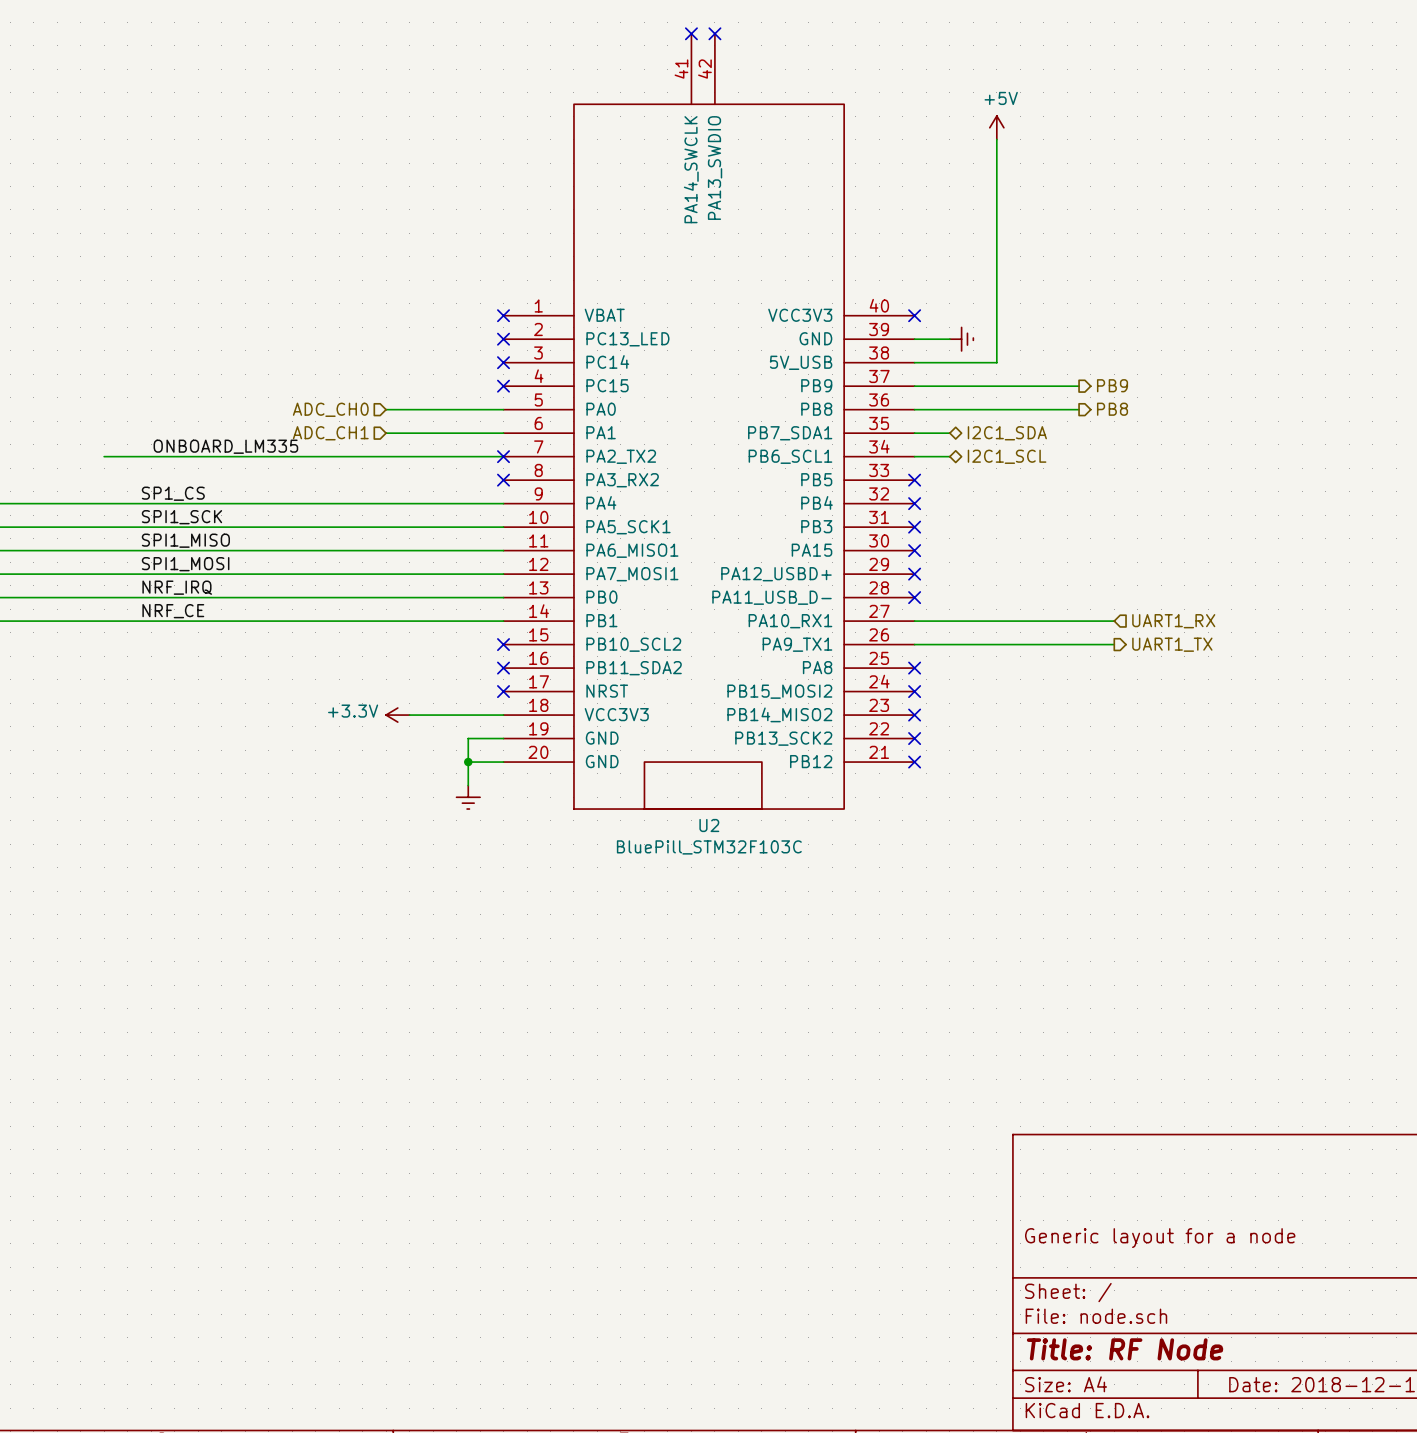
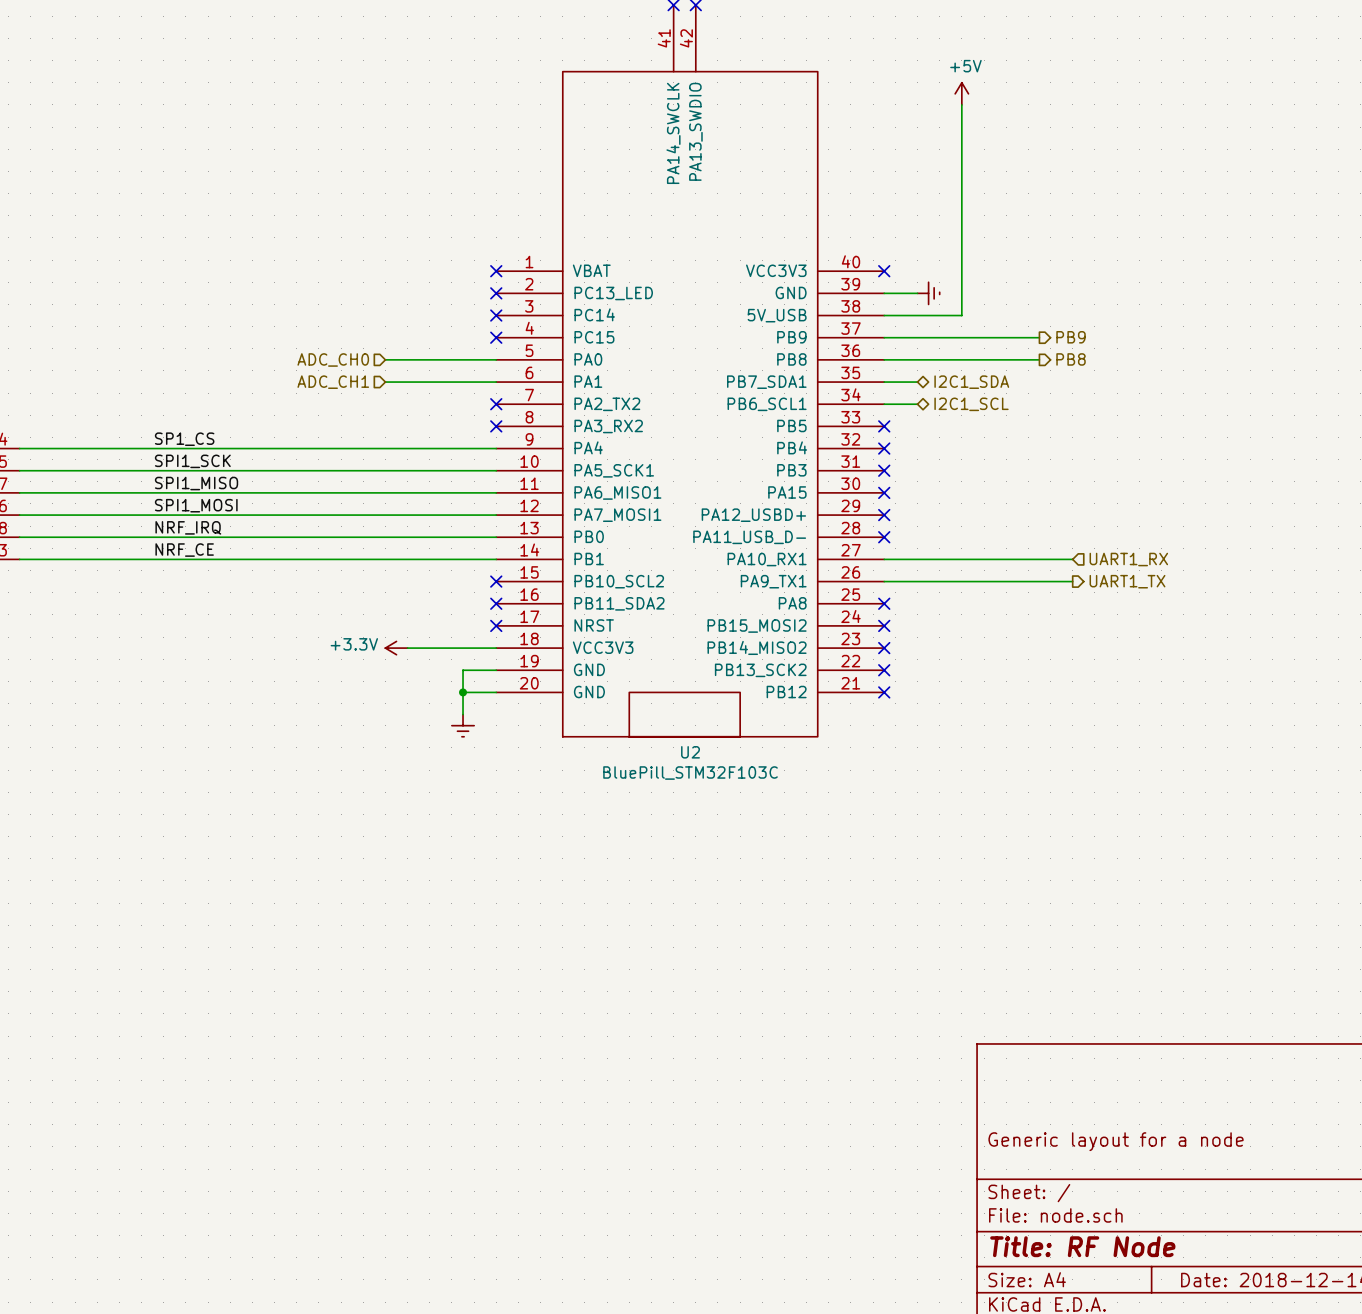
label: ONBOARD_LM335 (225, 446) -> none
wire: (104, 456) (503, 456) -> none

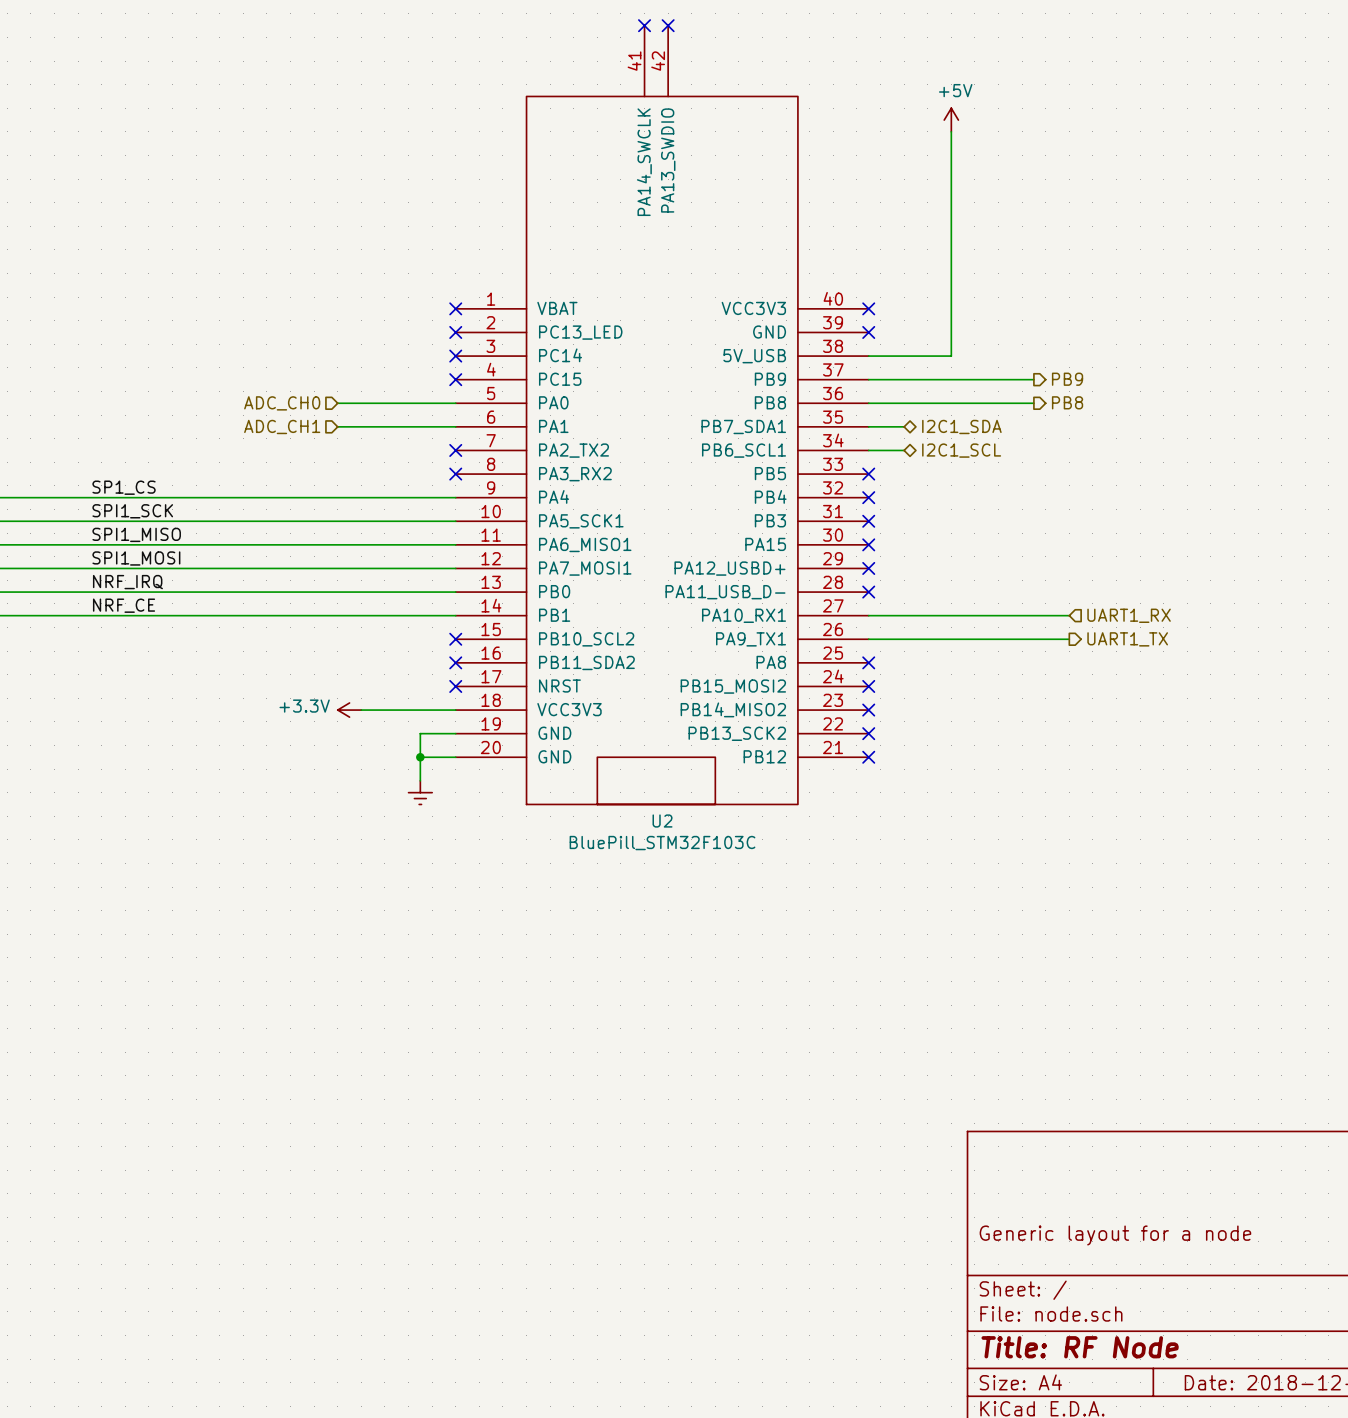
wire: (884, 293) (917, 293) -> none
no-connect mark: none -> (868, 332)
power symbol: (928, 293) -> none

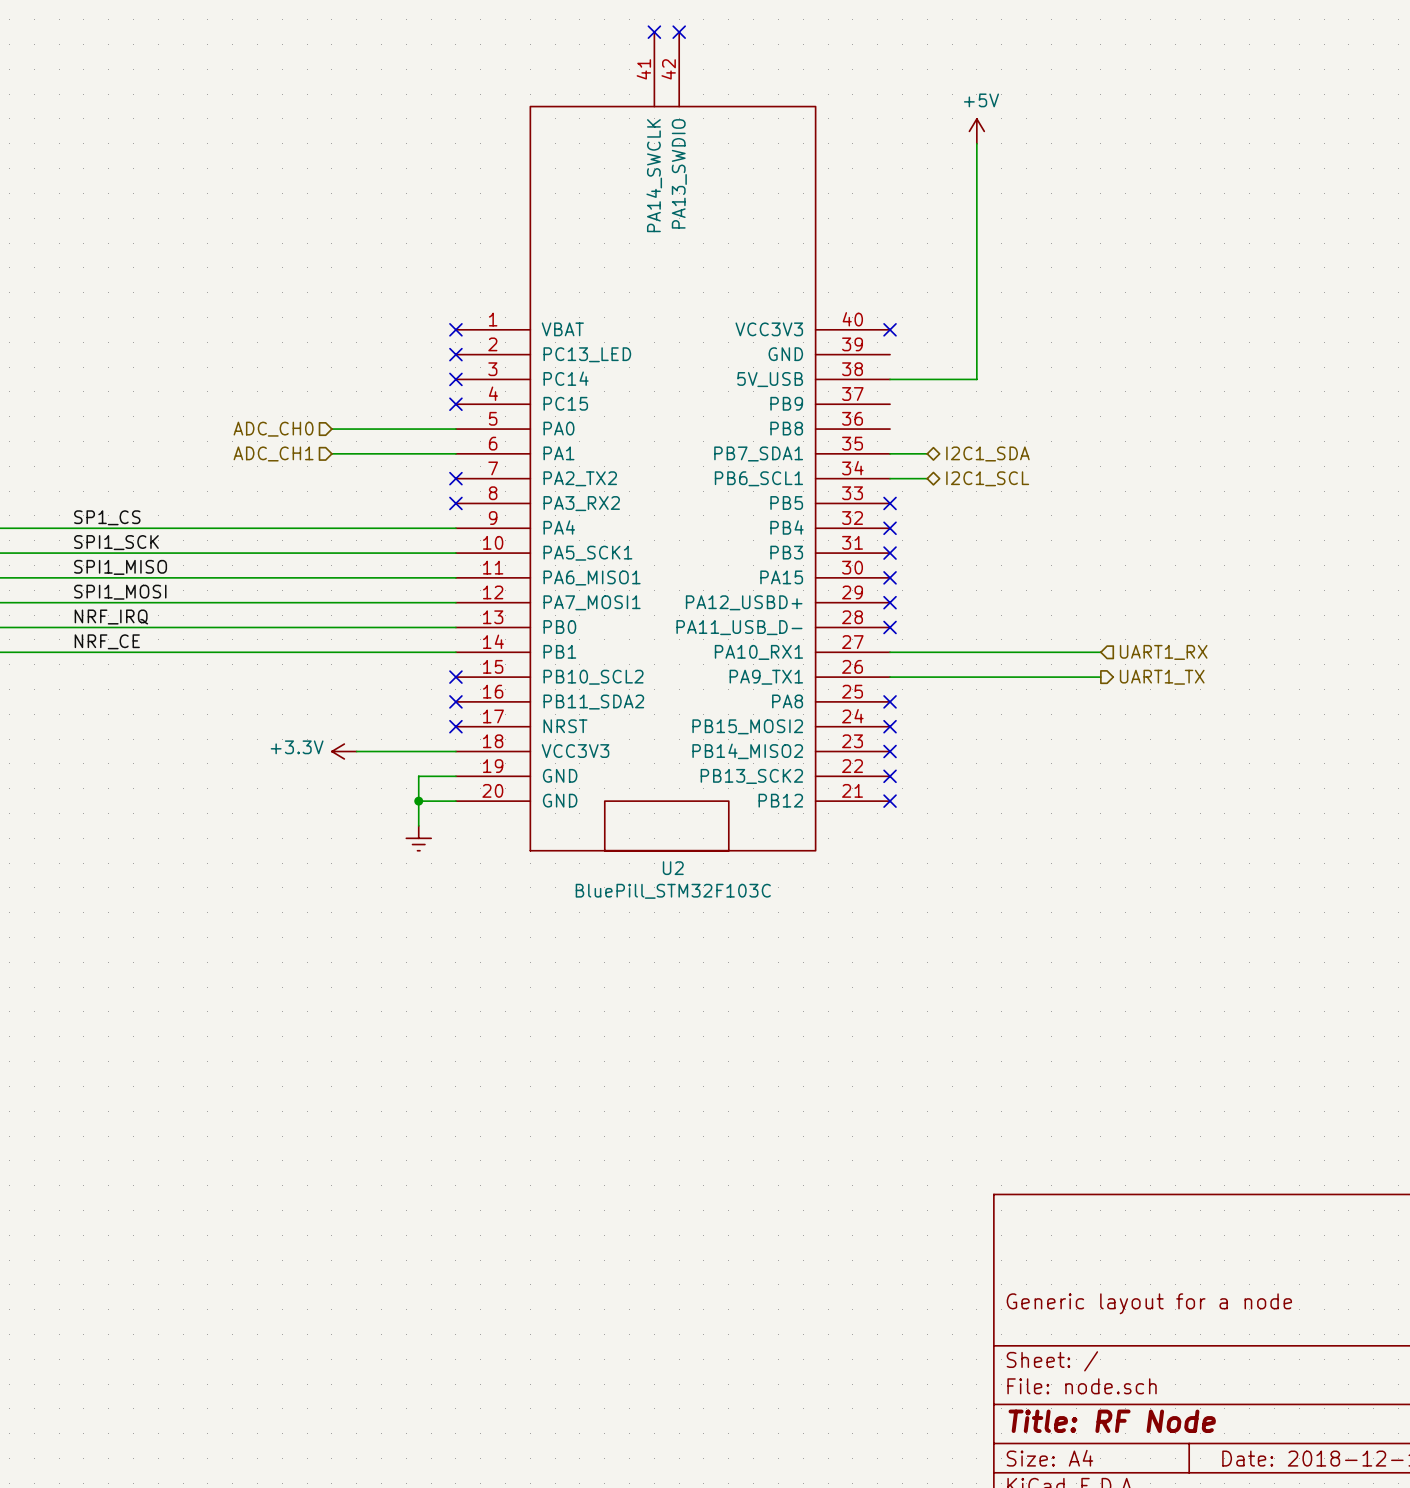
no-connect mark: (868, 332) -> none
wire: (868, 379) (1033, 379) -> none
hierarchical label: PB9 (1067, 379) -> none
hierarchical label: PB8 (1067, 402) -> none
wire: (868, 403) (1033, 403) -> none

